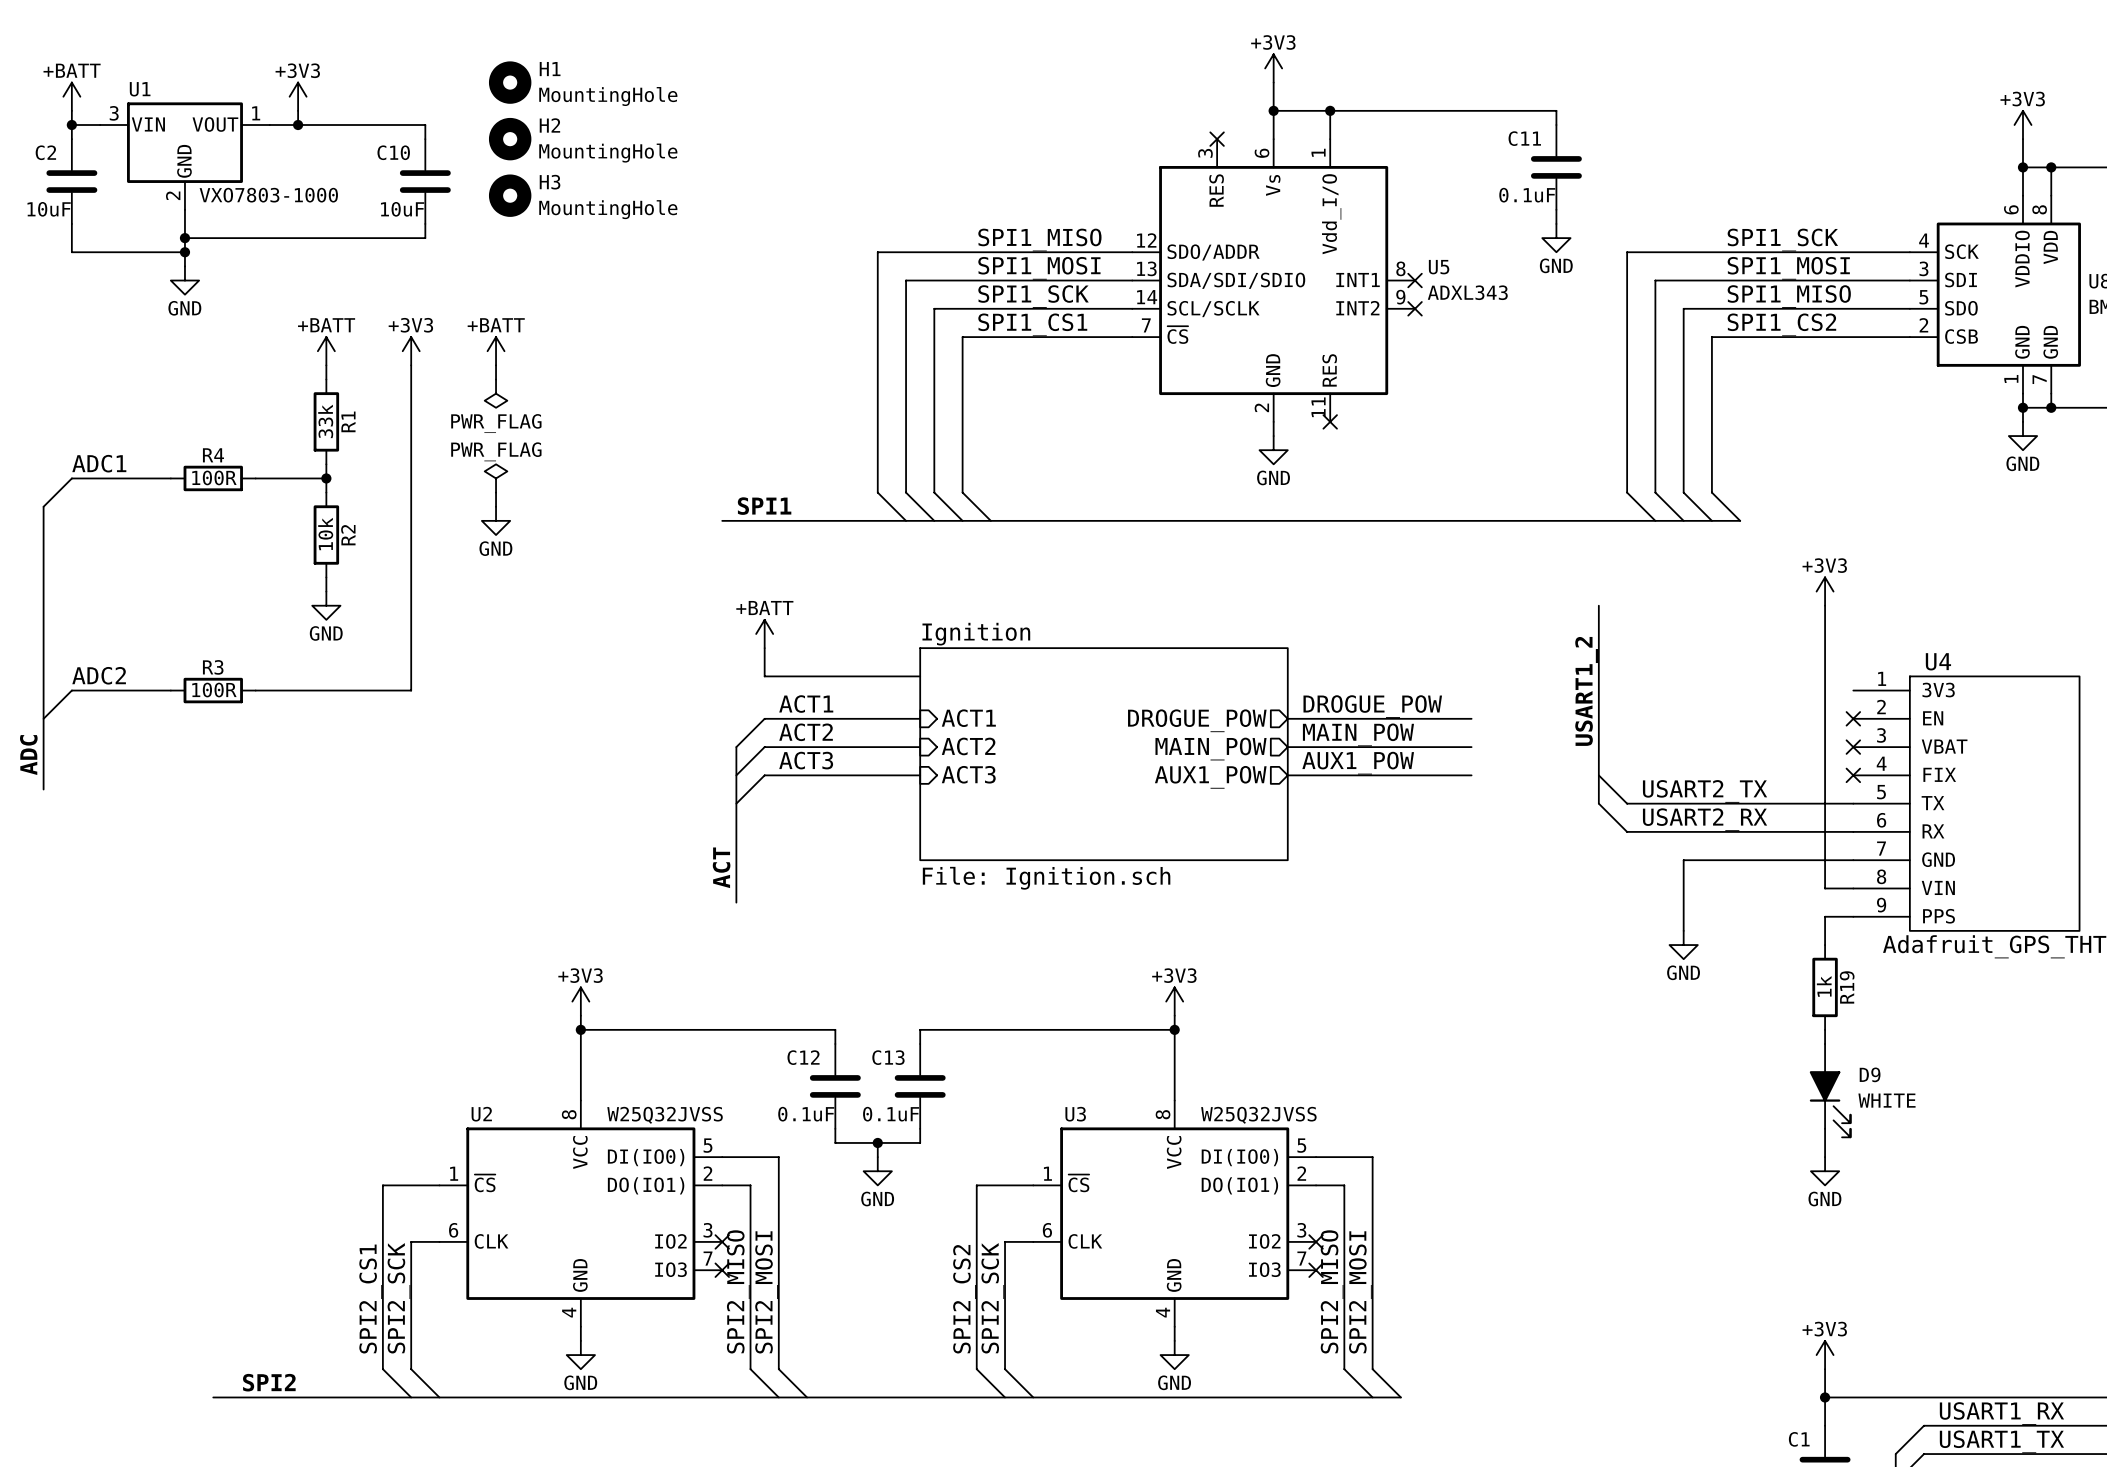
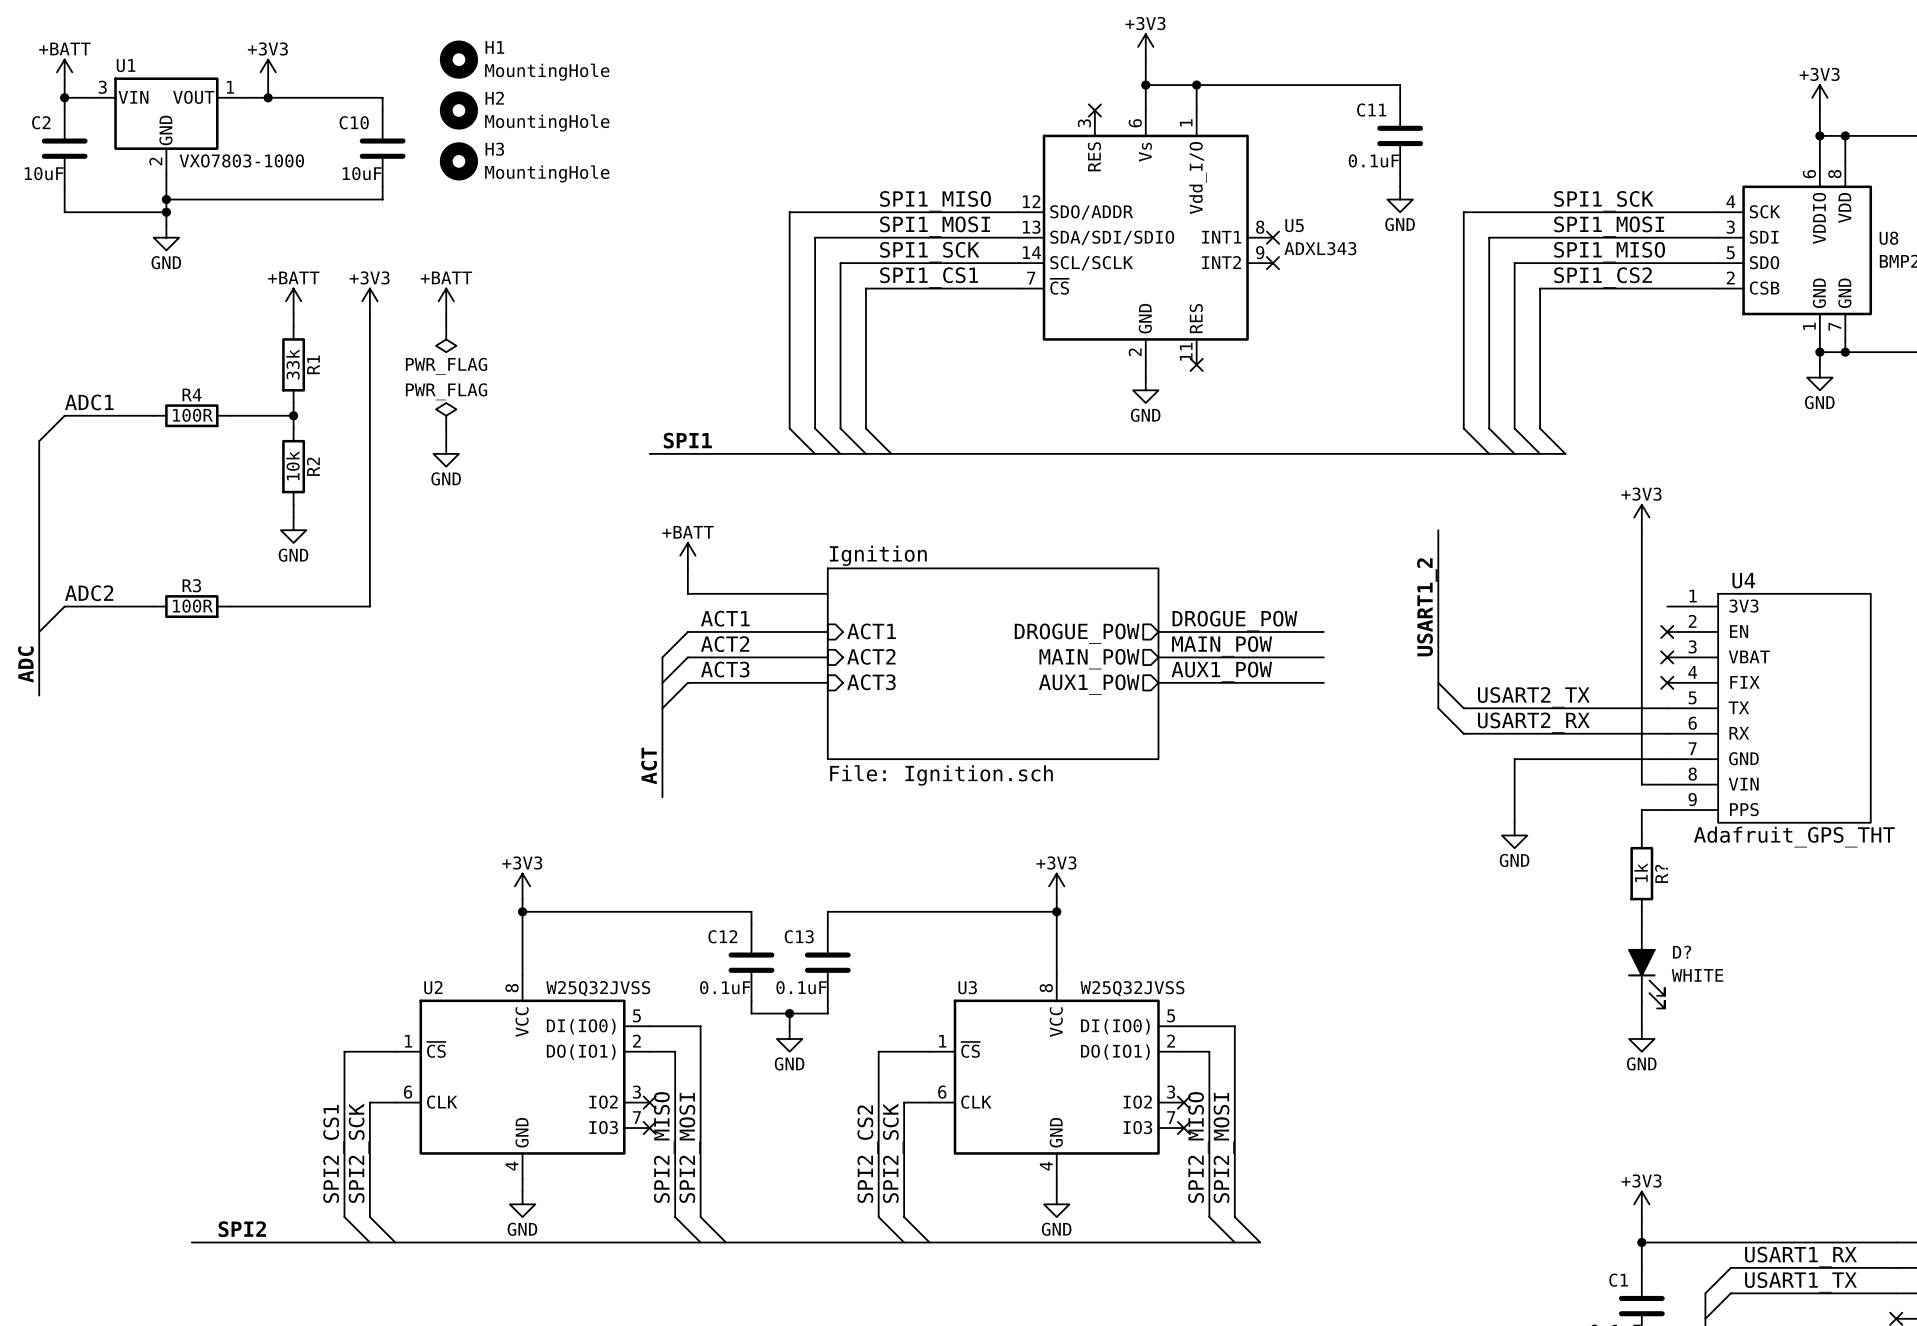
R19 name: R19 (1847, 987) -> R? (1661, 873)
D9 name: D9 (1870, 1074) -> D? (1682, 952)

